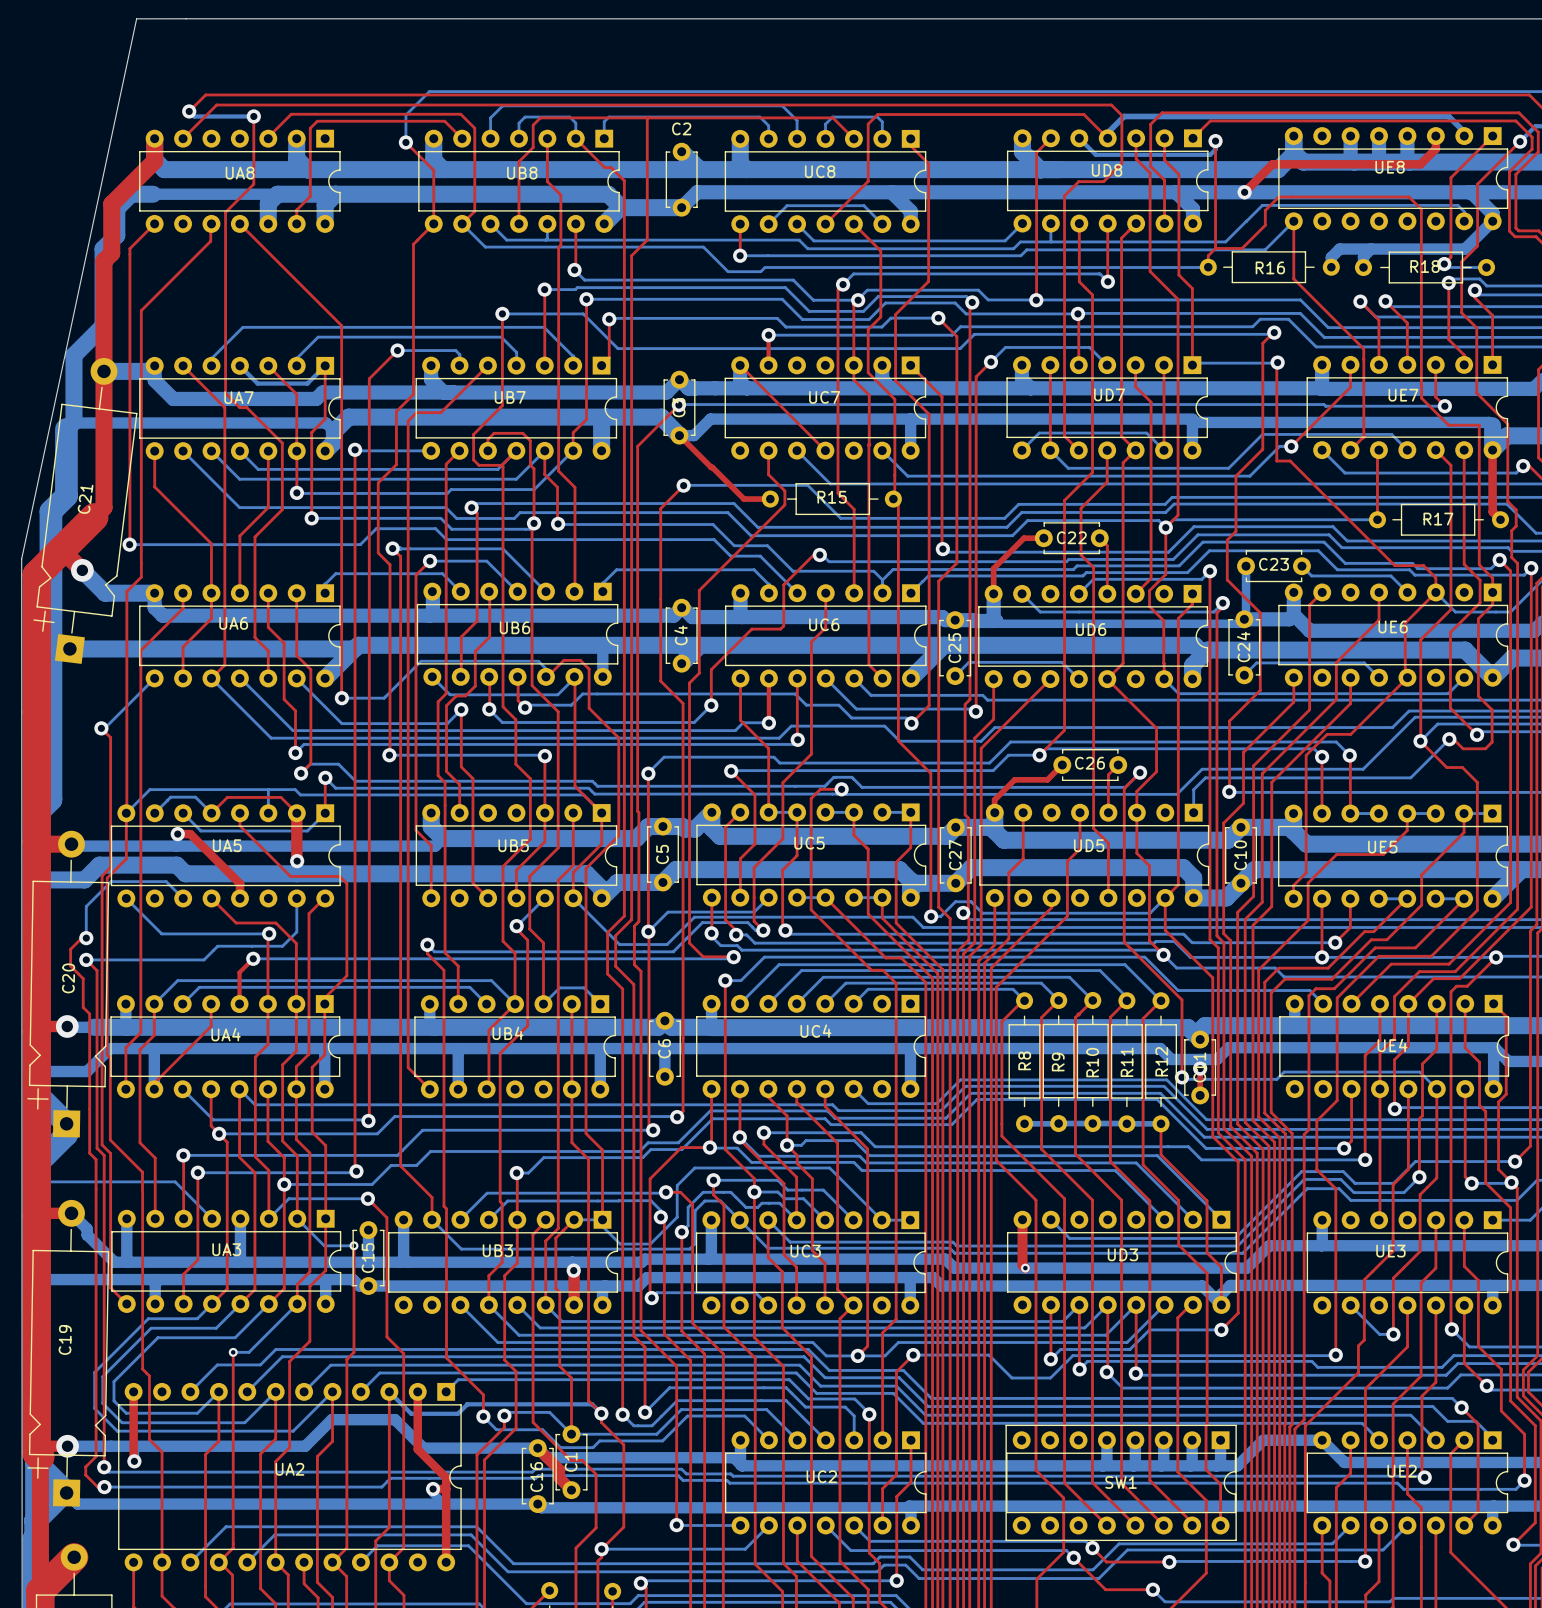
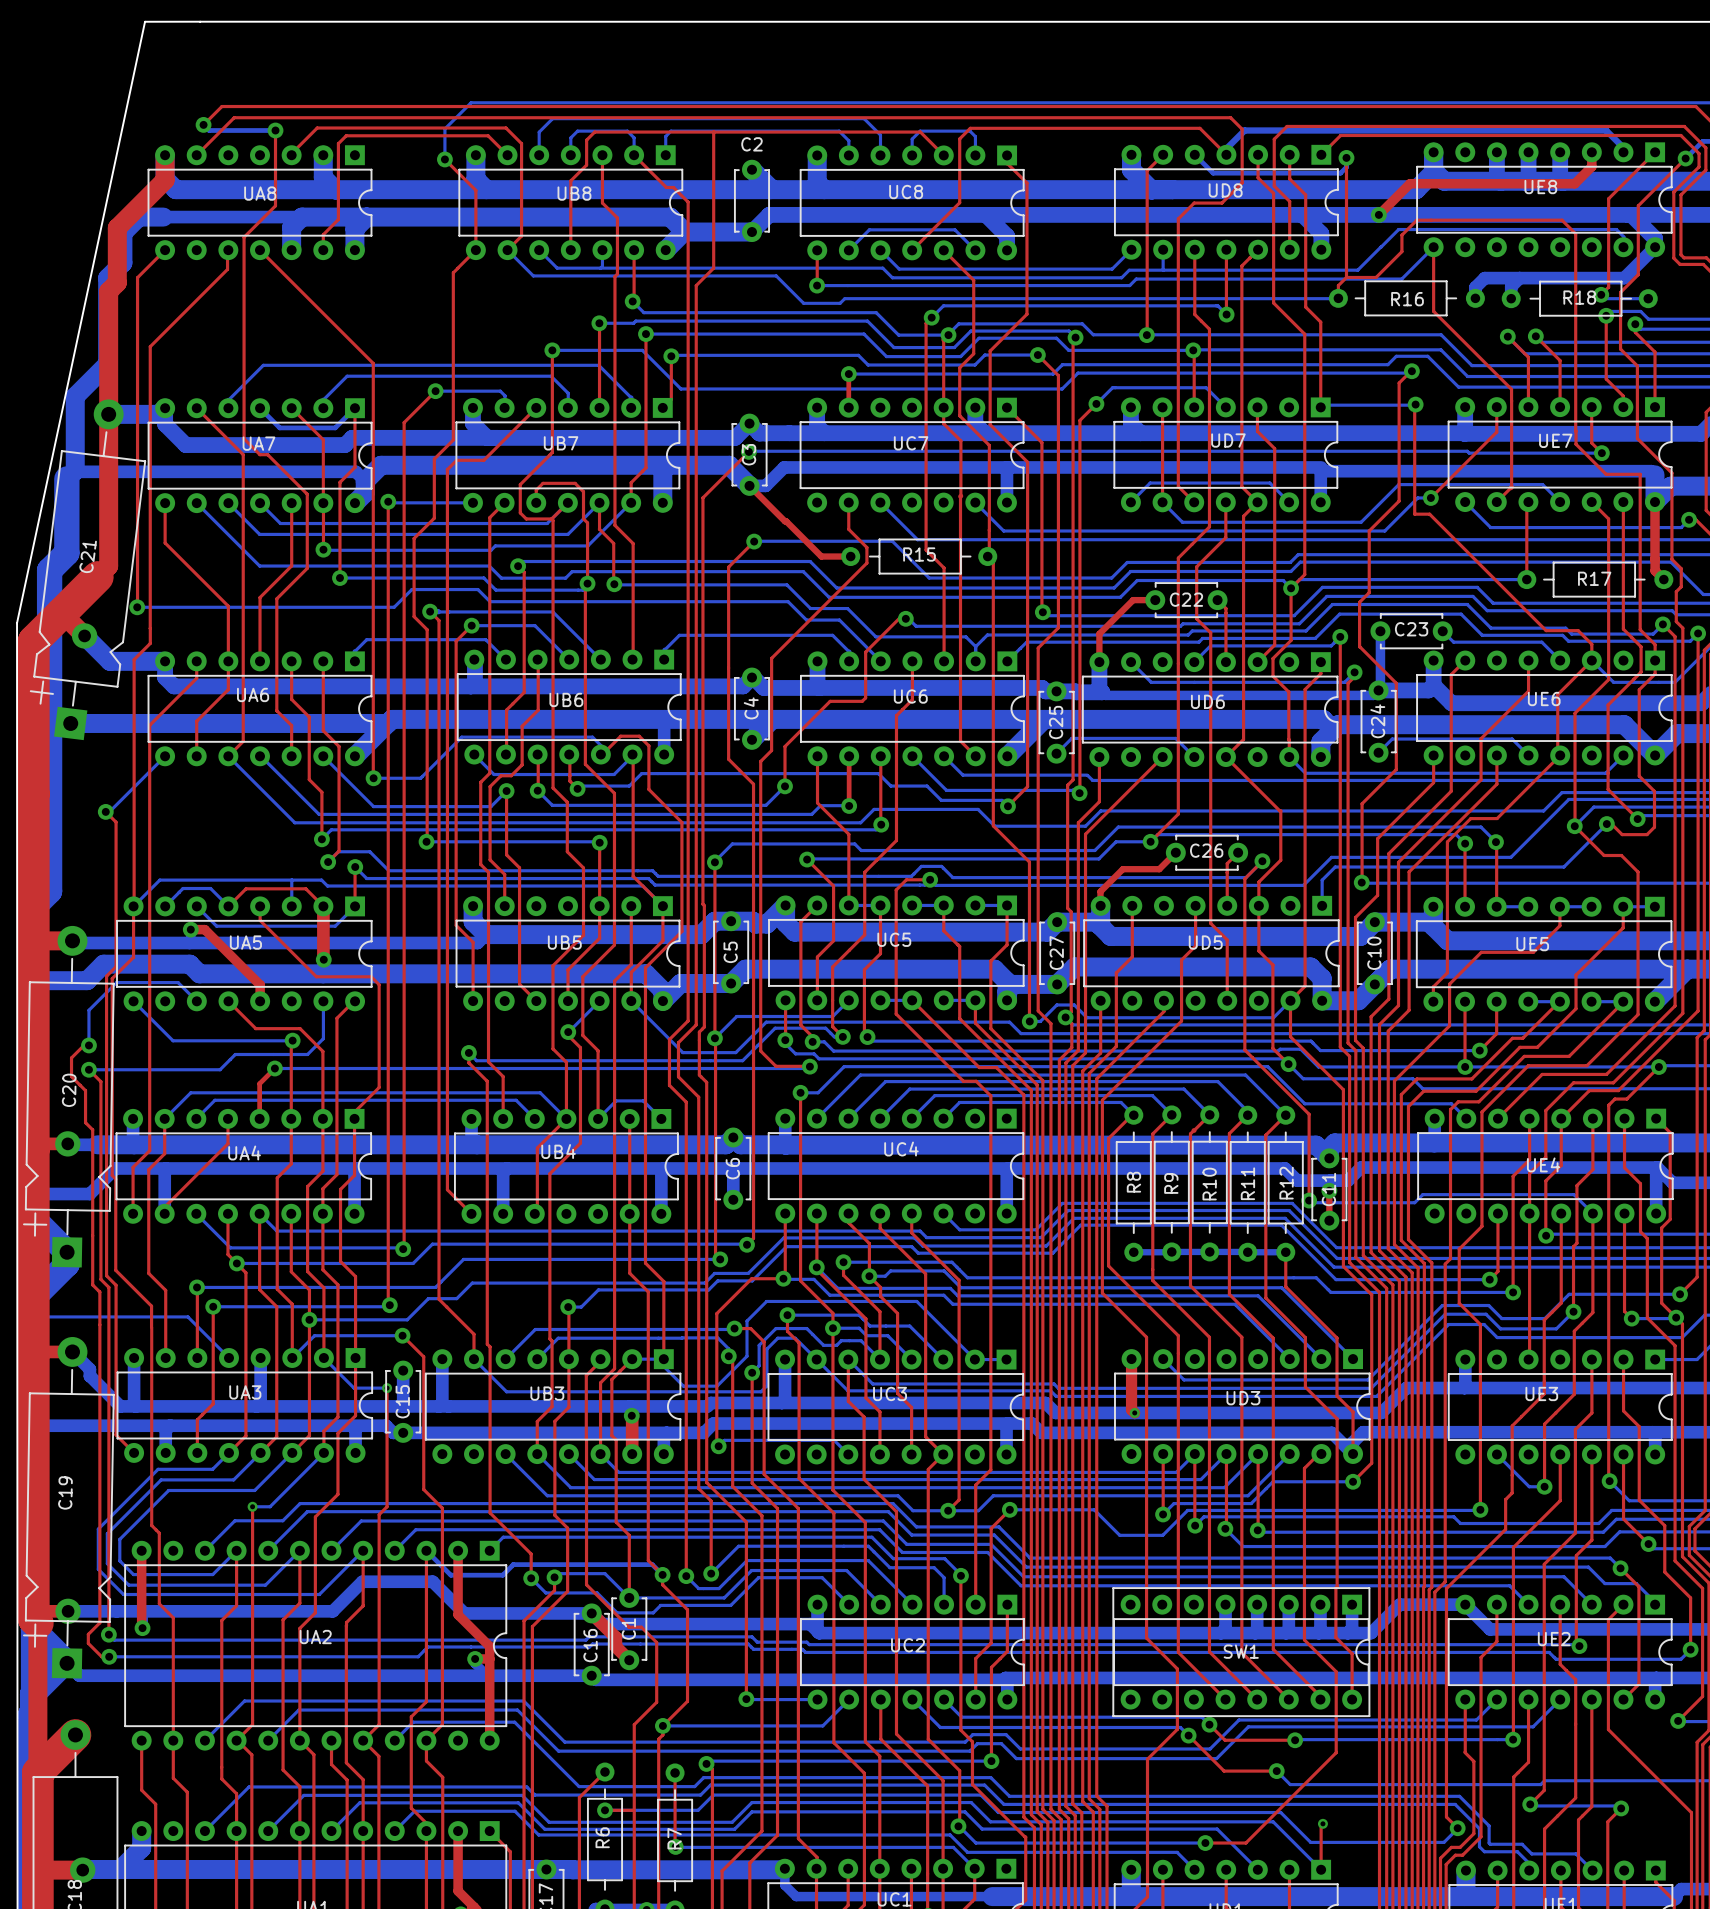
top track: (1164, 365) (1164, 450) -> none
top track: (740, 367) (740, 365) (825, 450) -> none

